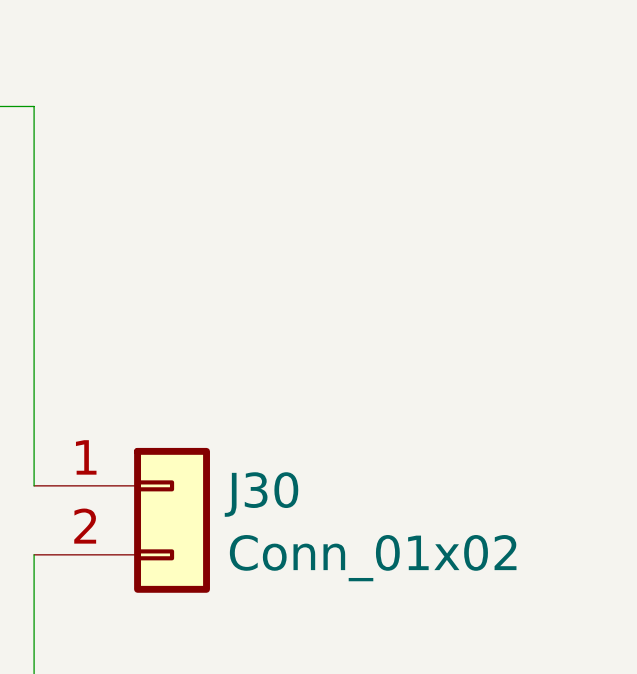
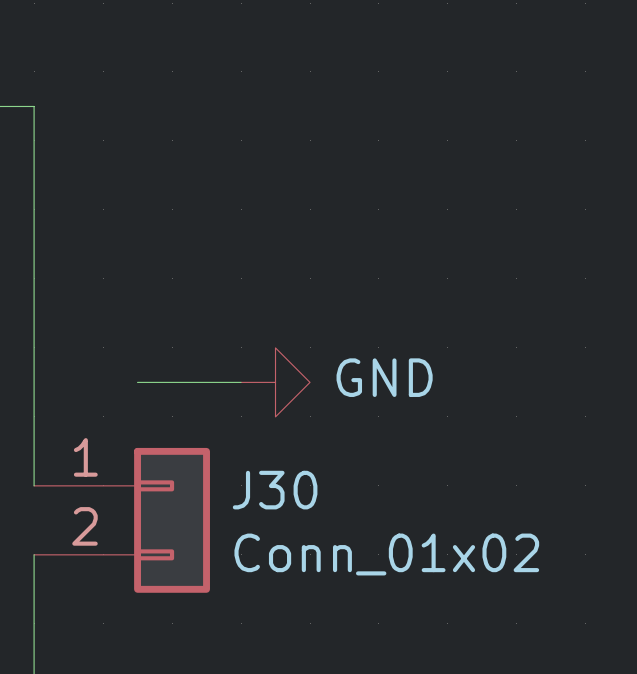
wire: none -> (137, 382) (241, 382)
power symbol: none -> GND (275, 382)

